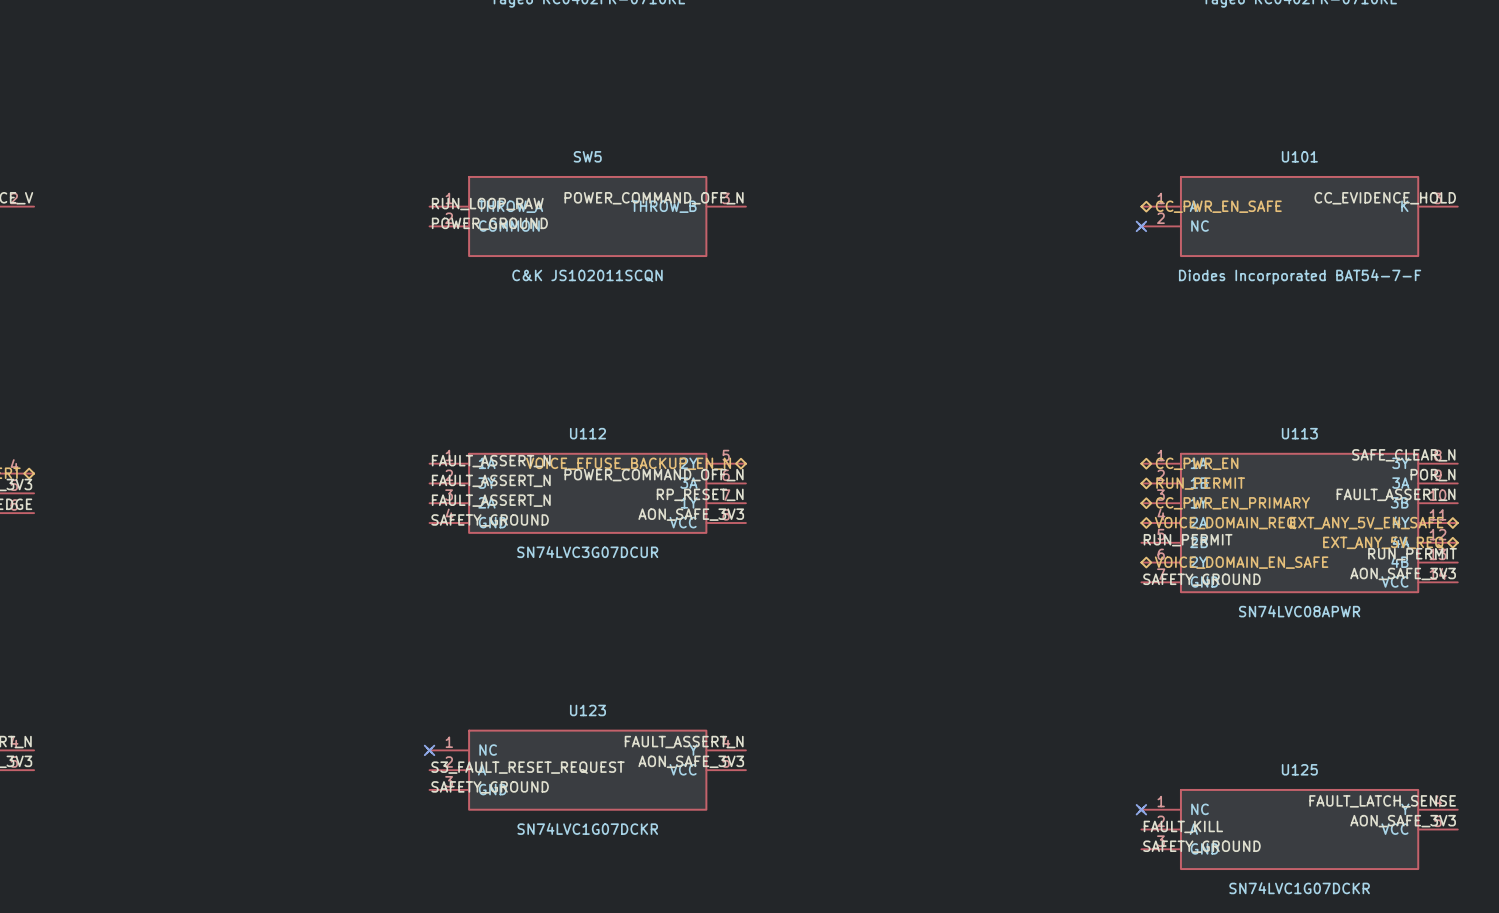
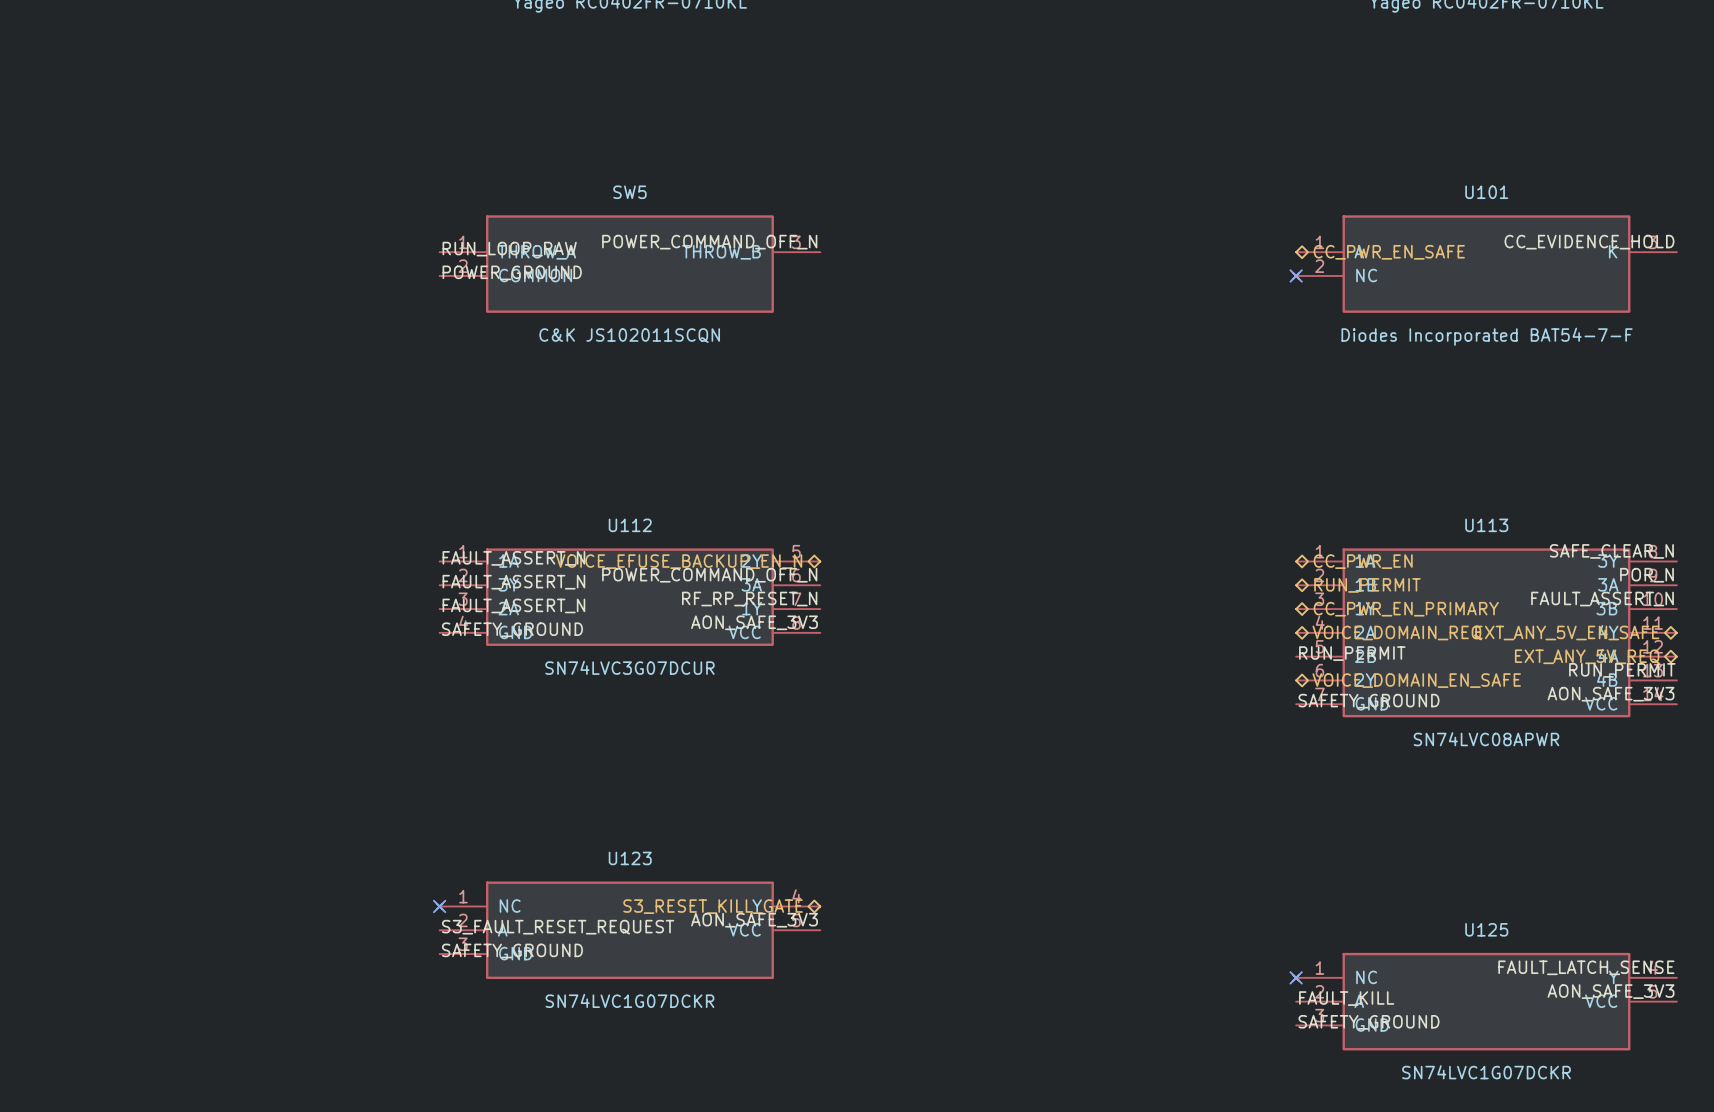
label: RP_RESET_N (700, 494) -> RF_RP_RESET_N (749, 599)
label: FAULT_ASSERT_N (684, 742) -> none
hierarchical label: none -> S3_RESET_KILL_GATE (713, 906)

